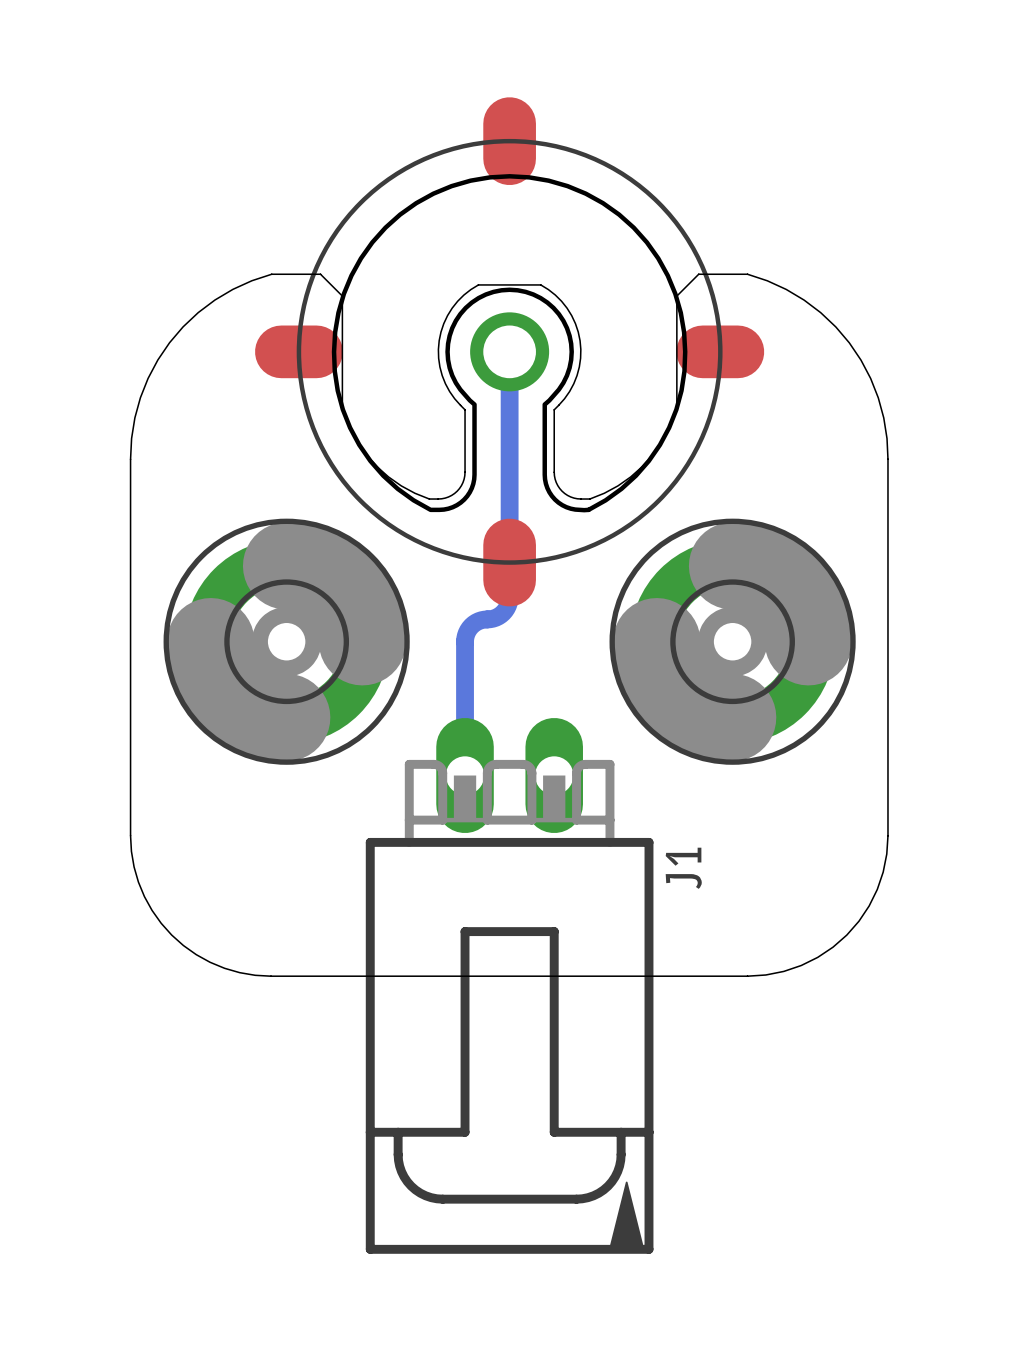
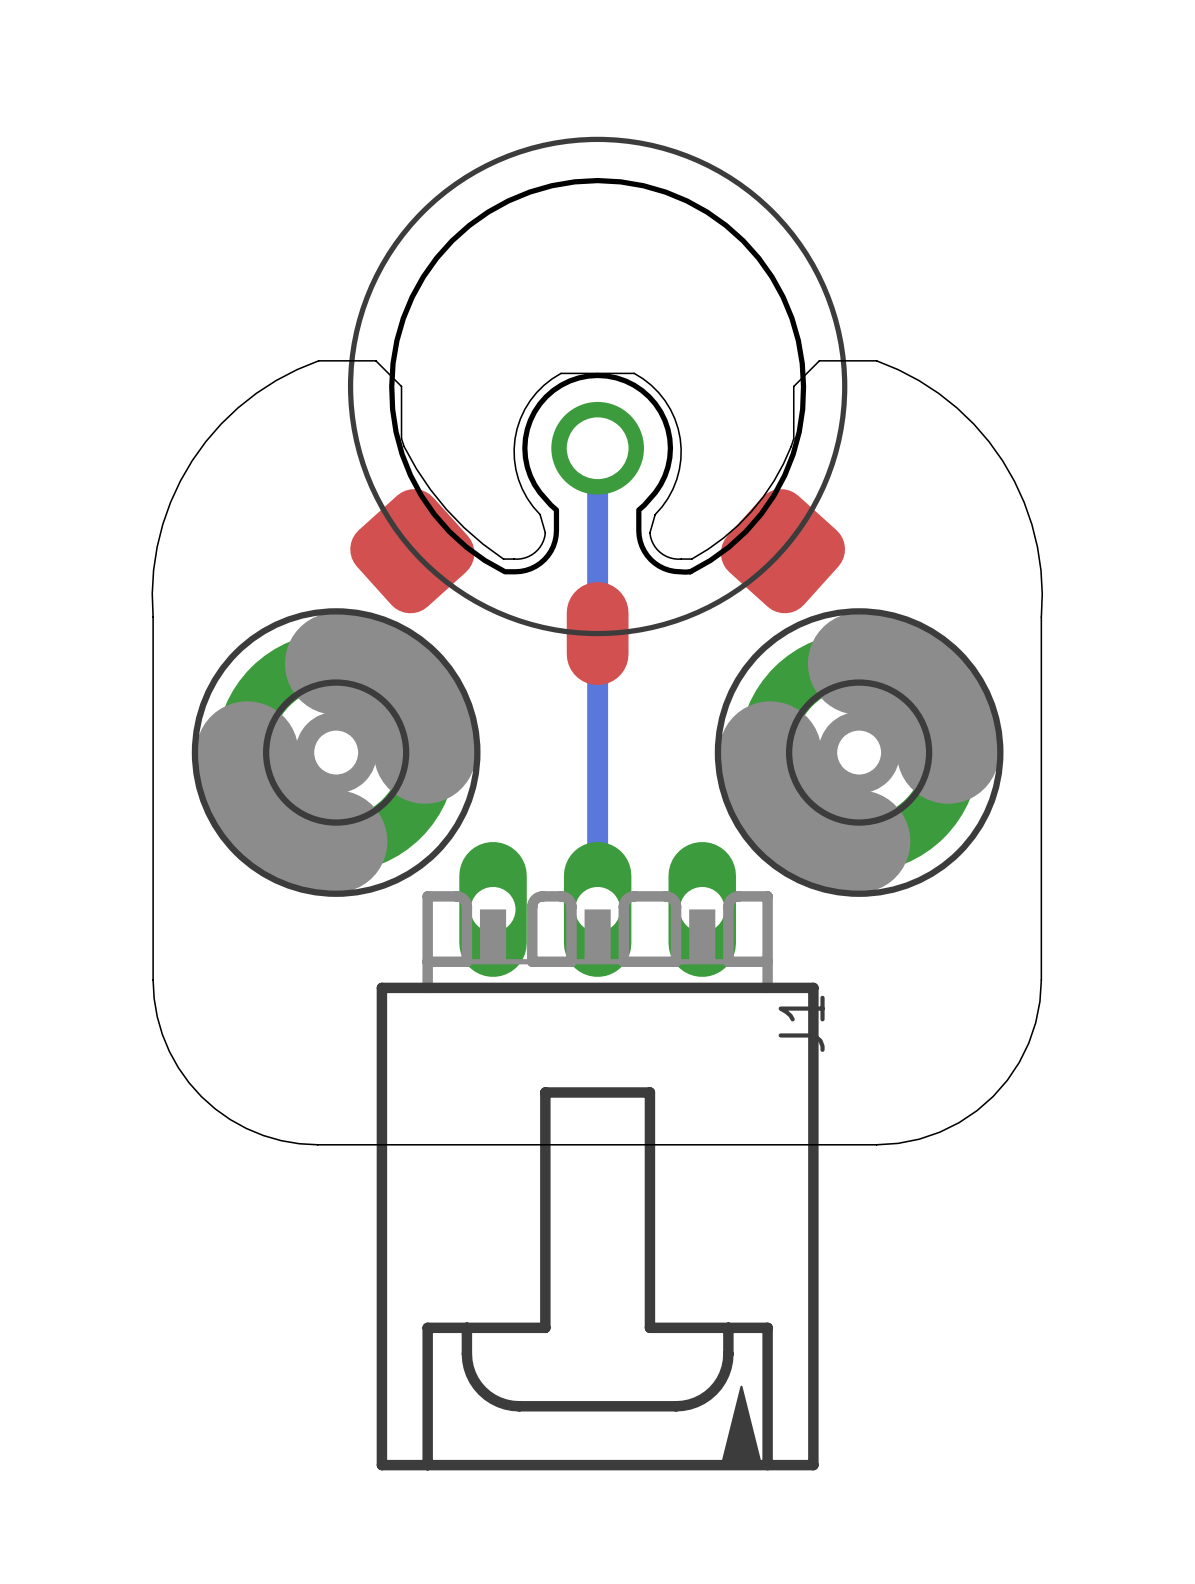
part footprint: [255, 97, 765, 607] -> [347, 136, 848, 686]
board edge: (342, 329) (342, 296) (320, 274) (271, 274) (232, 289) (198, 312) (169, 342) (157, 359) (140, 397) (131, 438) (130, 526) -> (401, 386) (375, 360) (318, 360) (276, 380) (238, 407) (205, 441) (180, 480) (170, 502) (157, 547) (152, 593) (153, 617)
board edge: (676, 329) (676, 296) (698, 274) (747, 274) (786, 289) (820, 312) (849, 342) (870, 378) (878, 397) (887, 438) (887, 526) -> (793, 386) (819, 360) (876, 360) (919, 380) (956, 407) (989, 441) (1014, 481) (1024, 502) (1037, 547) (1042, 593) (1041, 617)
board edge: (342, 374) (342, 407) (357, 442) (376, 466) (388, 476) (401, 485) (429, 499) (441, 498) (451, 495) (459, 488) (464, 479) (465, 409) (454, 398) (445, 383) (439, 367) (438, 349) (440, 332) (447, 315) (457, 301) (478, 284) (540, 284) (561, 301) (575, 323) (580, 340) (579, 367) (569, 391) (554, 409) (554, 475) (559, 488) (570, 496) (589, 499) (604, 493) (630, 476) (652, 455) (668, 428) (676, 407) (676, 374) -> (401, 438) (416, 468) (430, 489) (463, 527) (503, 559) (517, 559) (528, 556) (537, 549) (545, 532) (540, 514) (527, 498) (518, 479) (514, 449) (517, 428) (524, 409) (536, 392) (561, 373) (634, 373) (658, 392) (670, 409) (680, 438) (679, 469) (667, 498) (655, 514) (649, 532) (657, 549) (670, 557) (691, 559) (723, 537) (738, 525) (763, 496) (774, 480) (793, 438)
bottom track: (509, 597) (507, 605) (503, 612) (495, 617) (476, 622) (469, 628) (465, 635) (465, 775) -> (597, 700) (597, 909)
J1 footprint: [365, 717, 654, 1254] -> [376, 841, 819, 1471]

